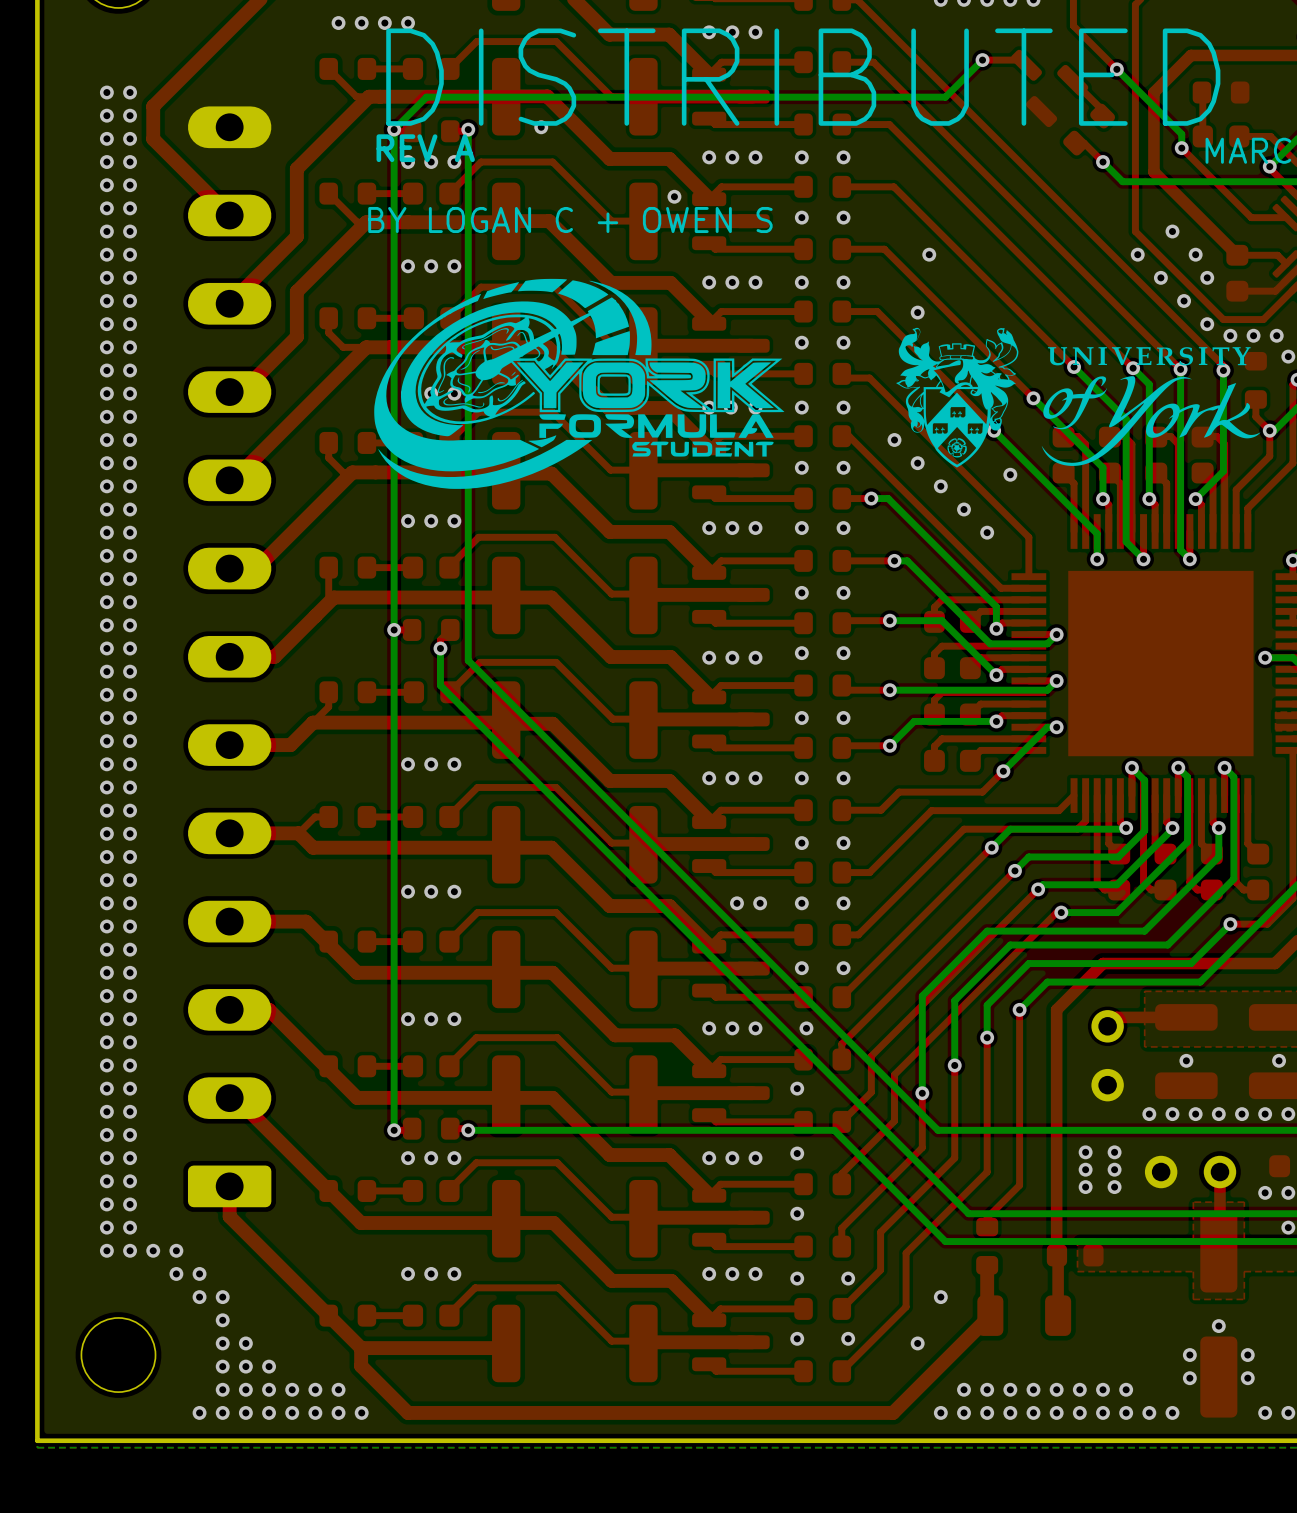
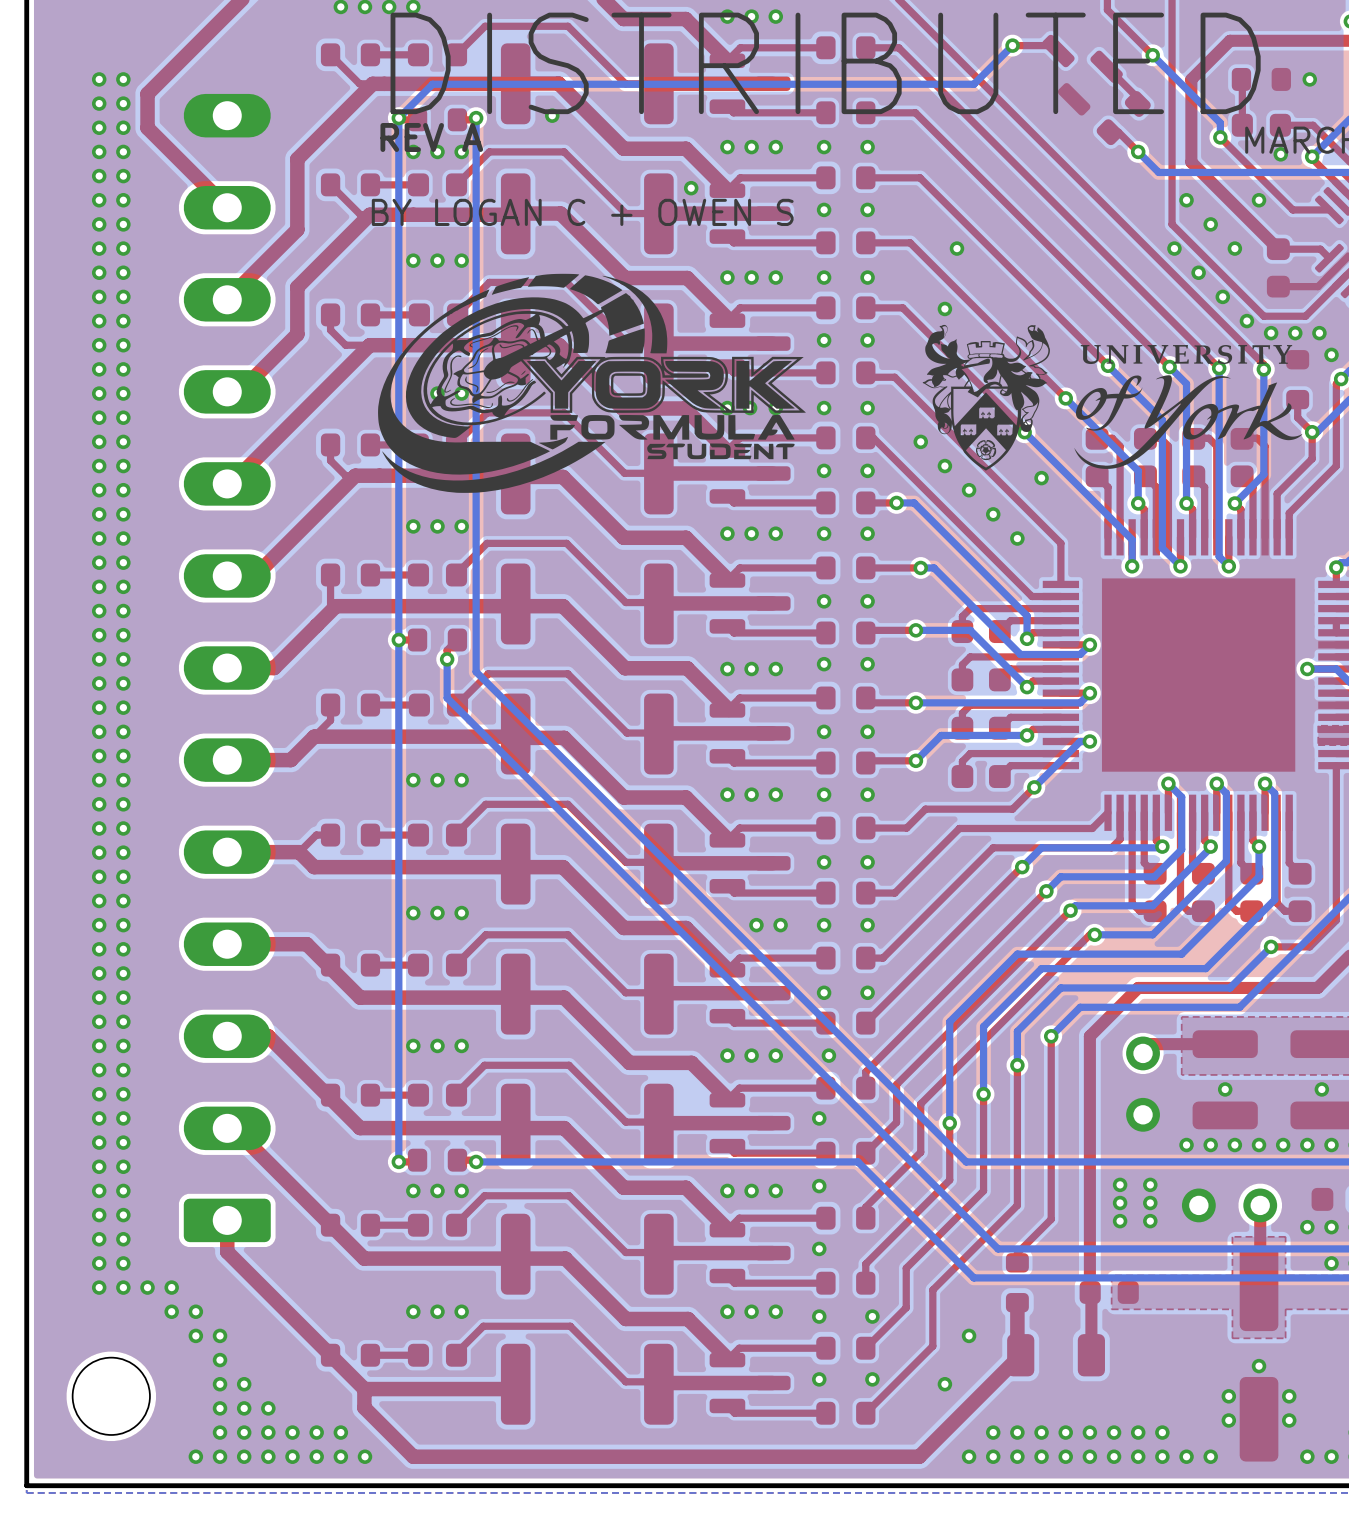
via: none -> (1309, 79)
via: none -> (1280, 154)
via: none -> (1186, 200)
via: none -> (1259, 200)
via: (1207, 277) -> none

